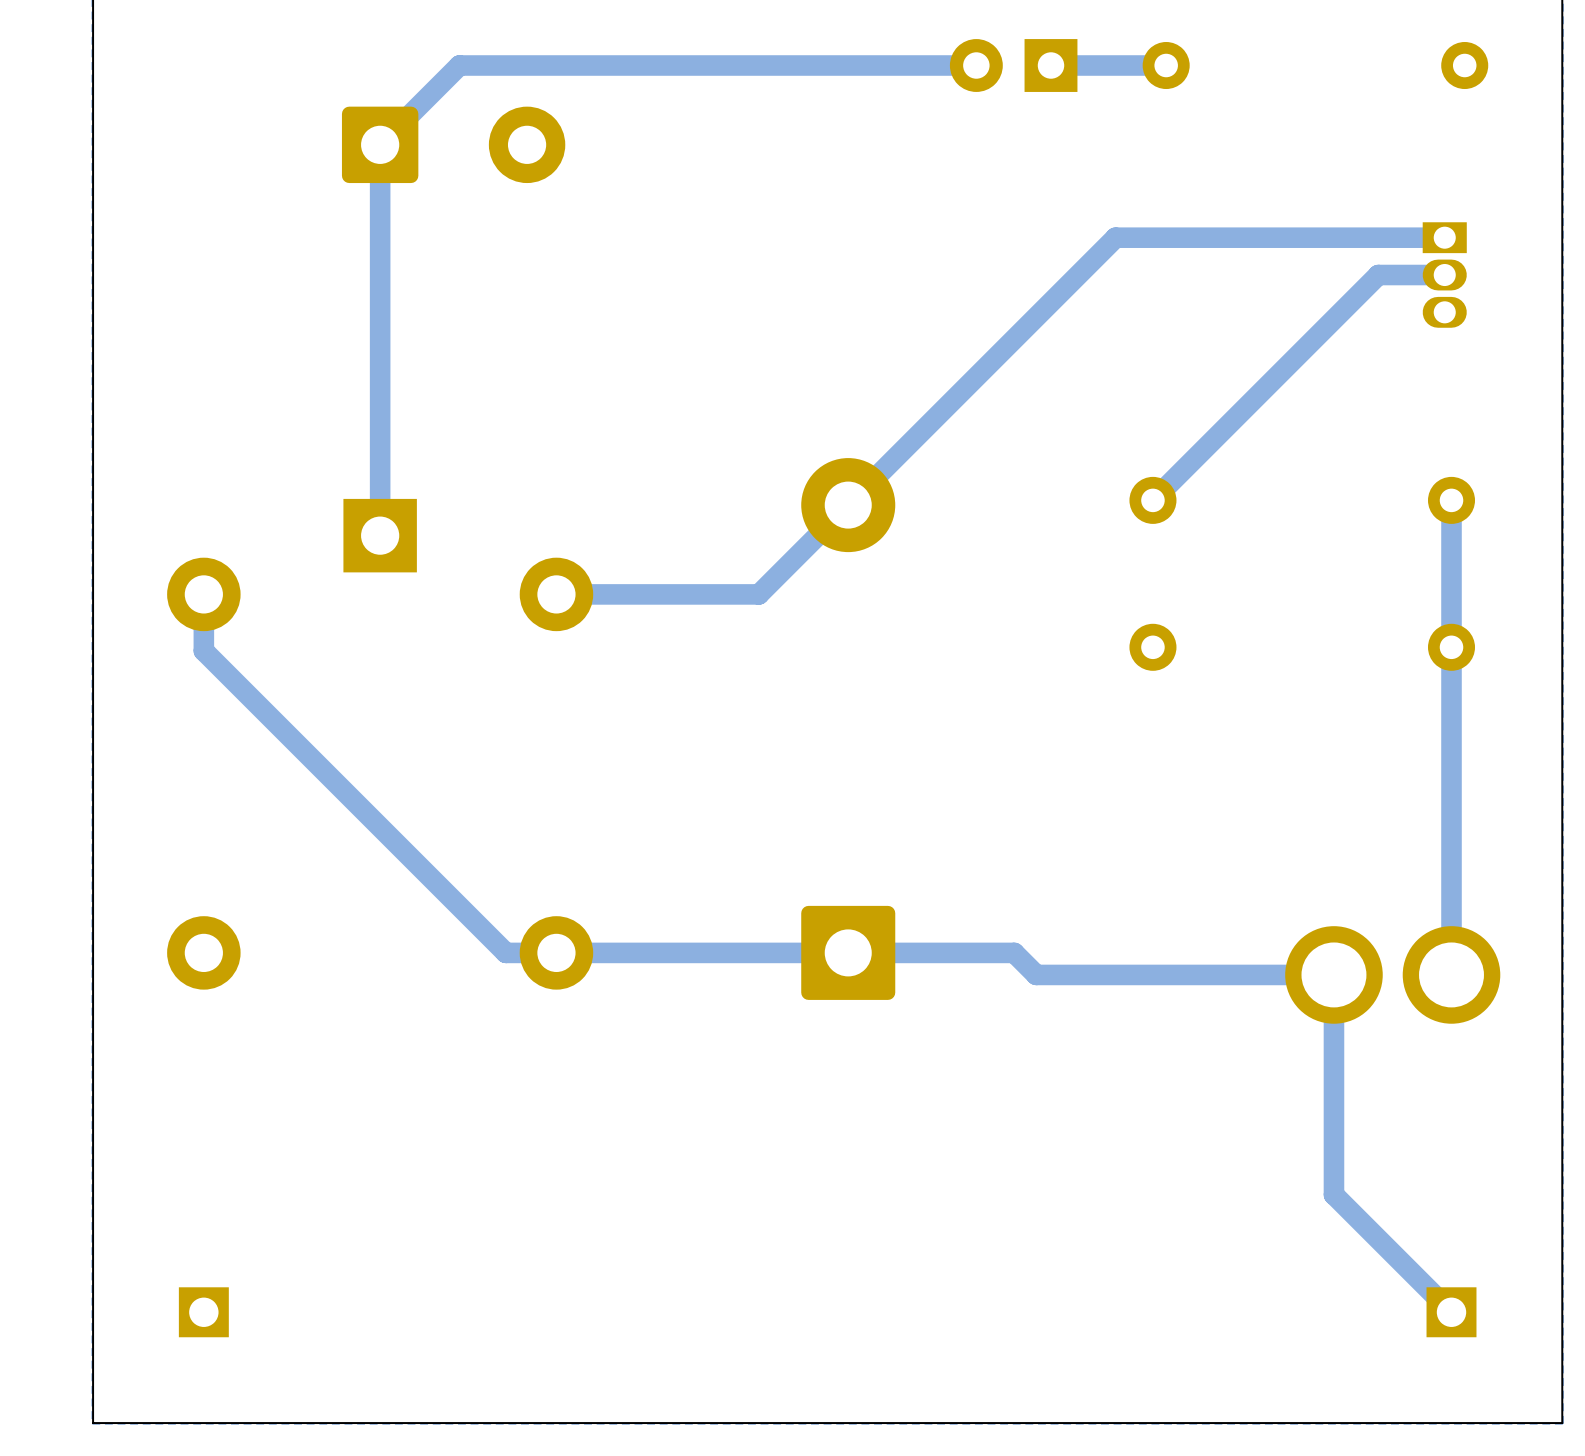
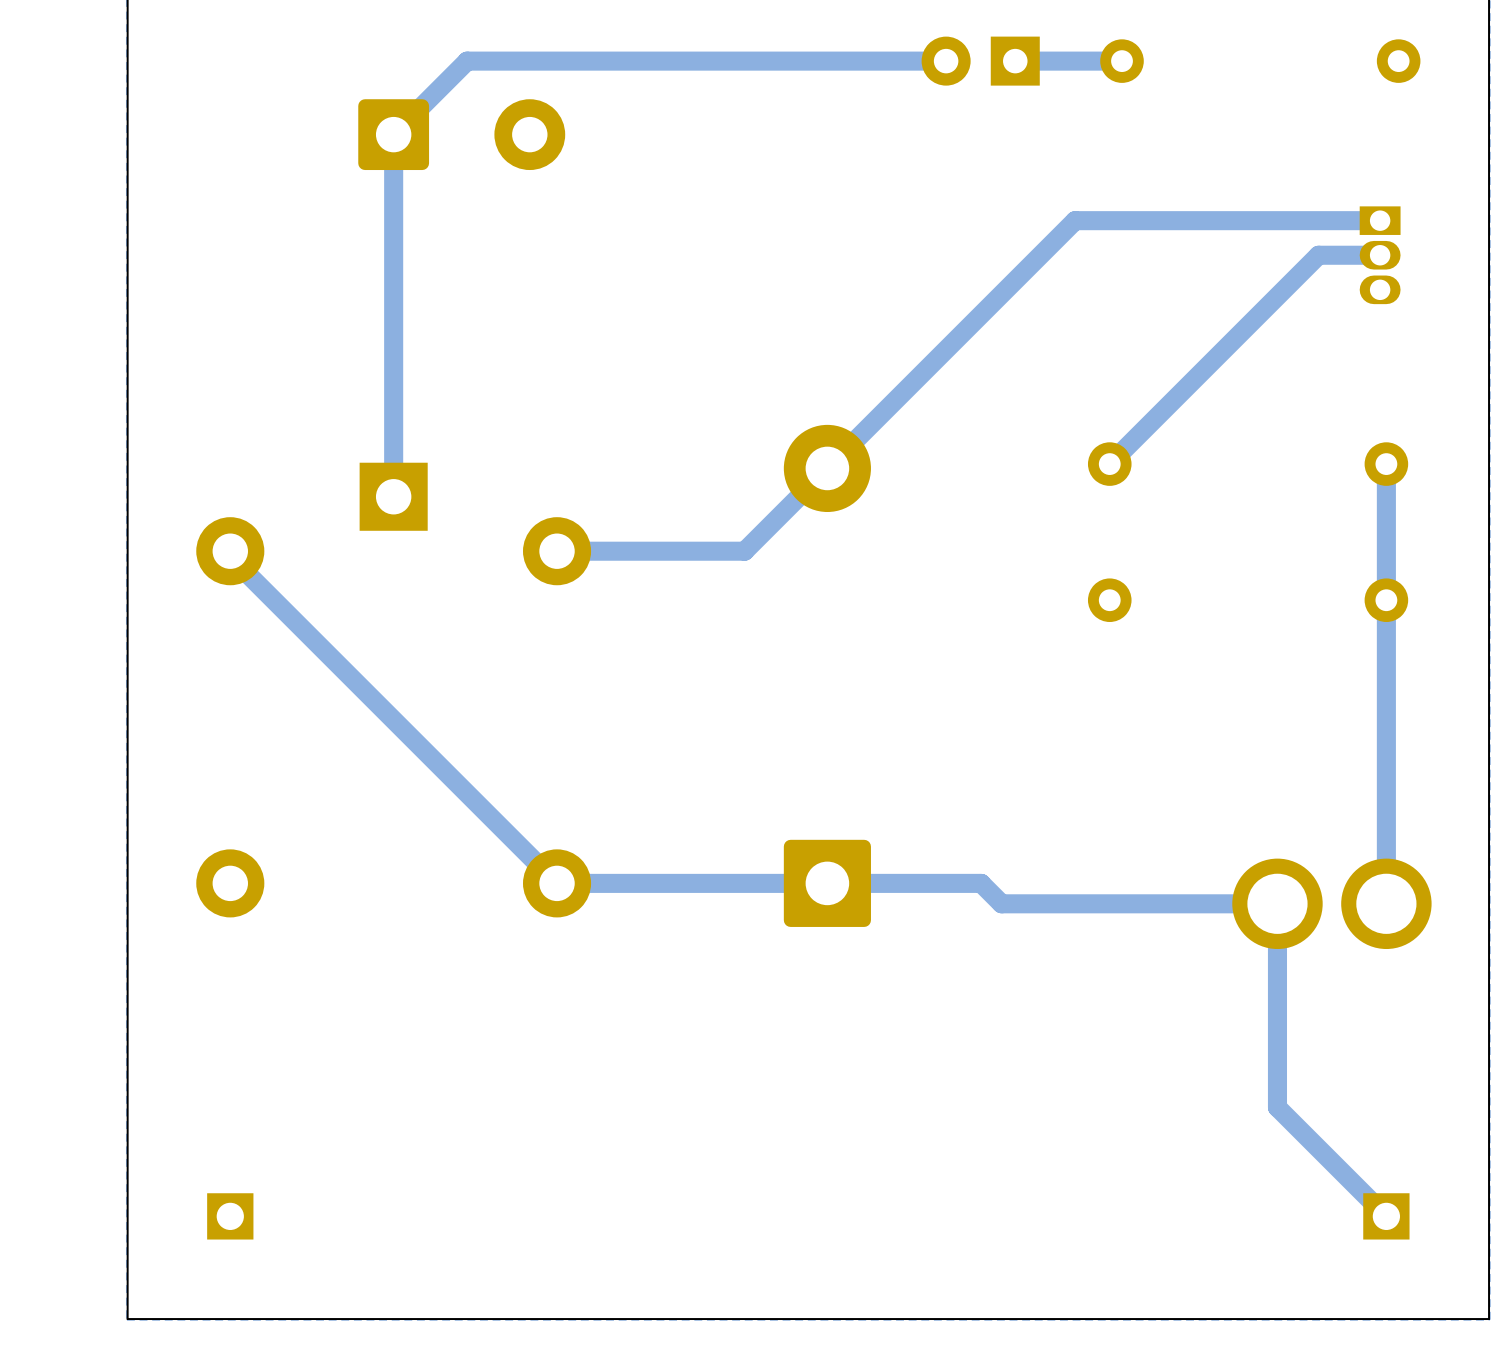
bottom track: (203, 600) (203, 650) (505, 952) (556, 952) -> (230, 556) (557, 883)

